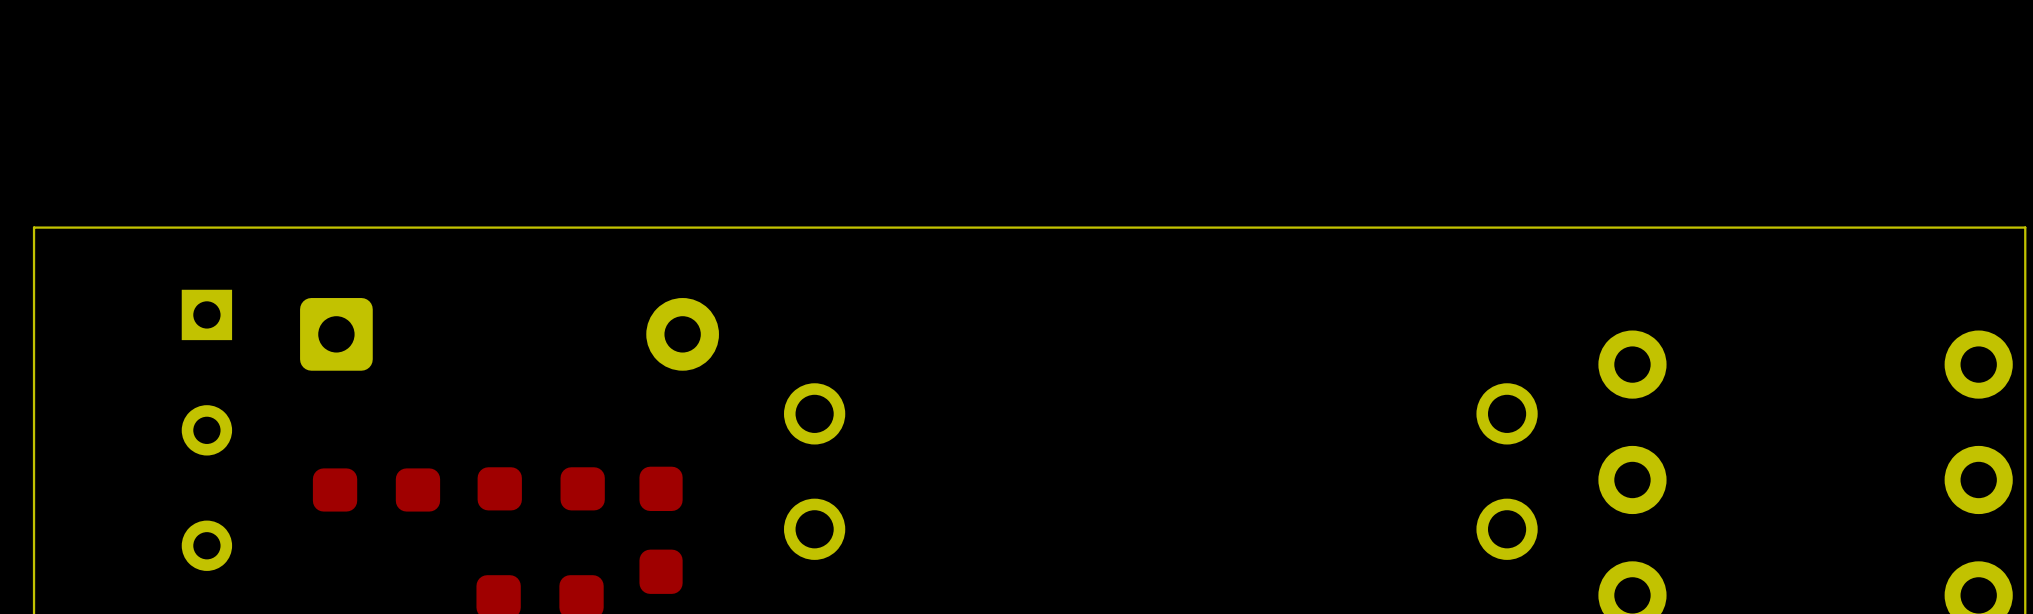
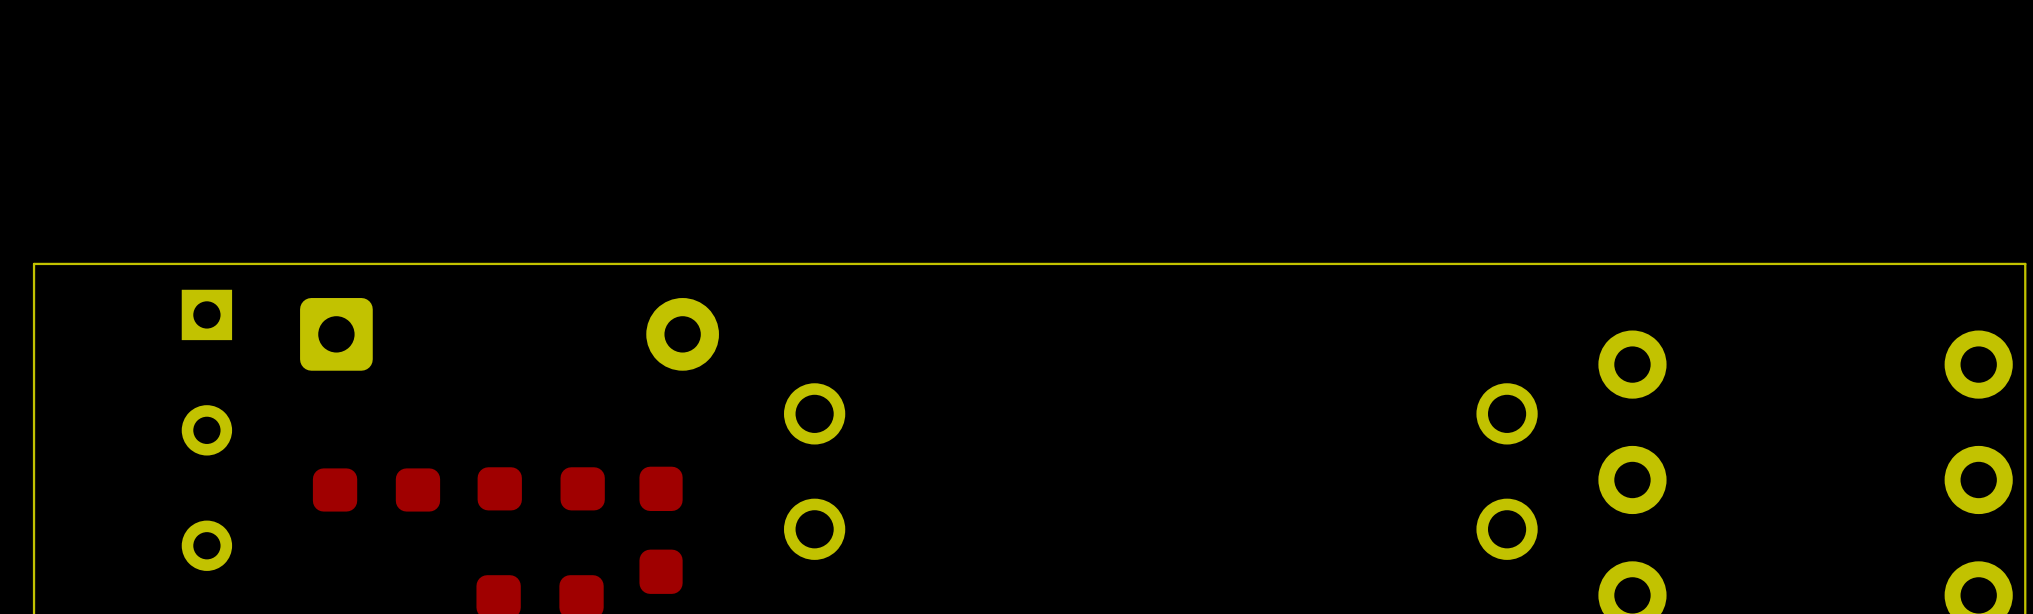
board edge: (2025, 263) (2025, 227) (34, 227) (34, 263) -> (2025, 263) (34, 263)

